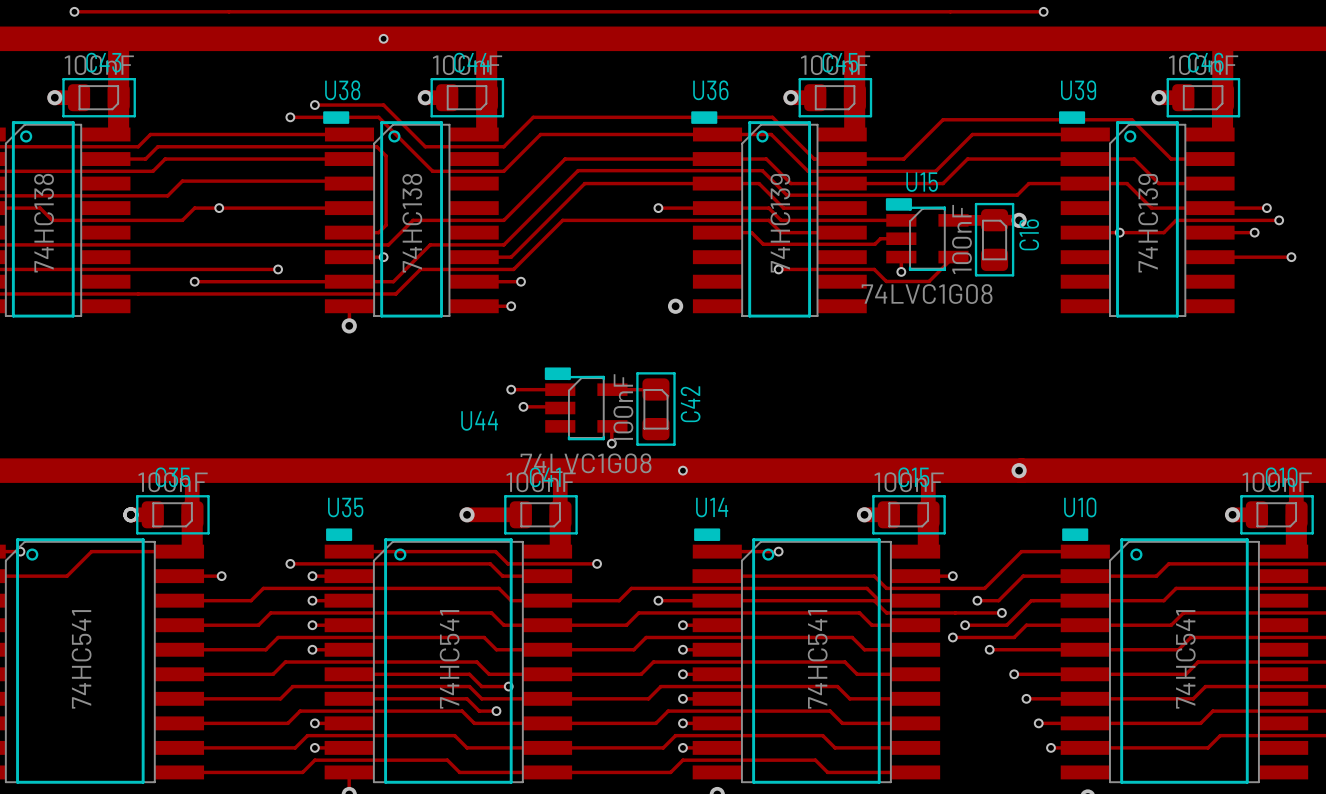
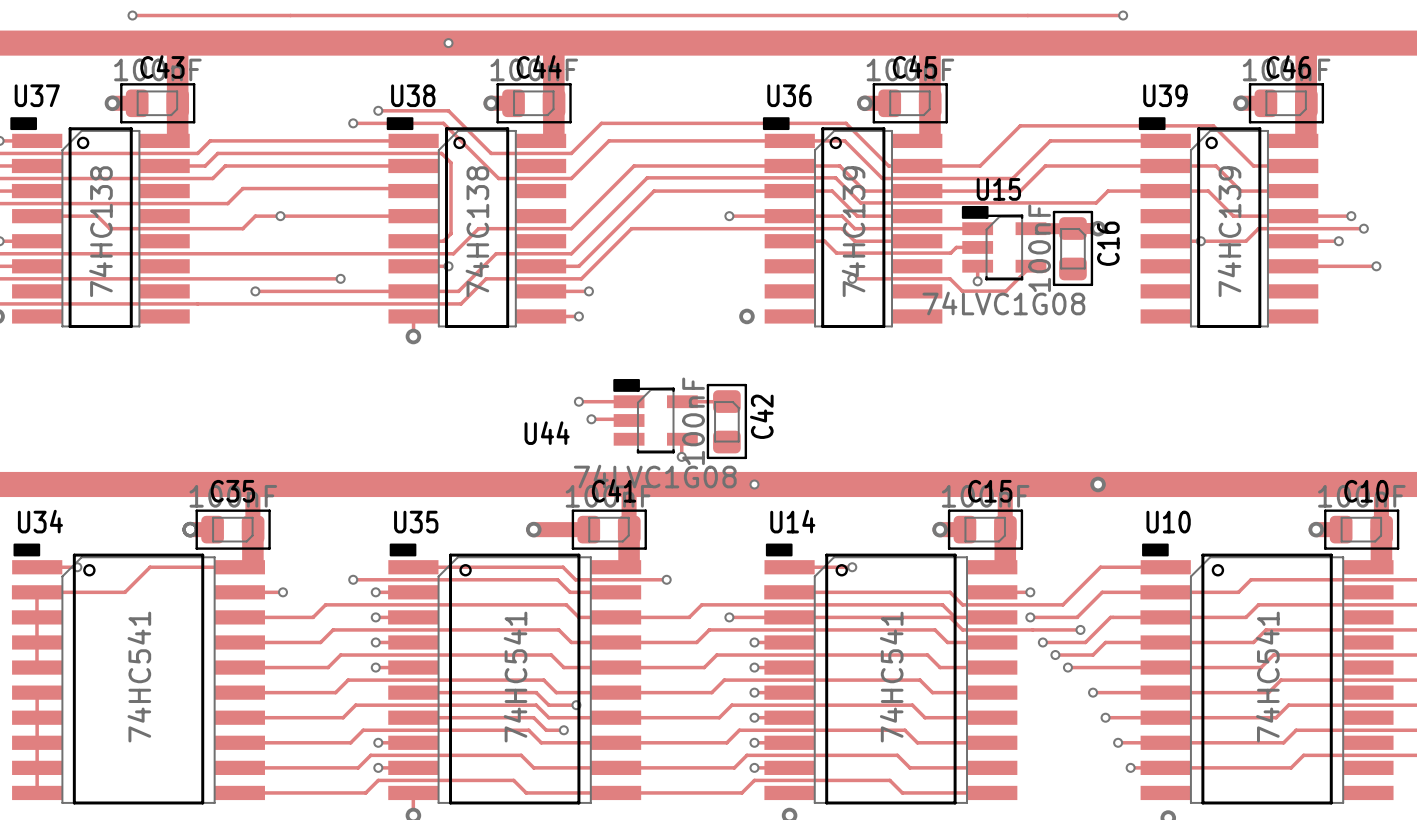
via: none -> (1030, 617)
via: (977, 600) -> none
track: (952, 637) (977, 637) -> (1030, 617) (1055, 617)
via: (952, 637) -> none
via: none -> (1055, 655)

